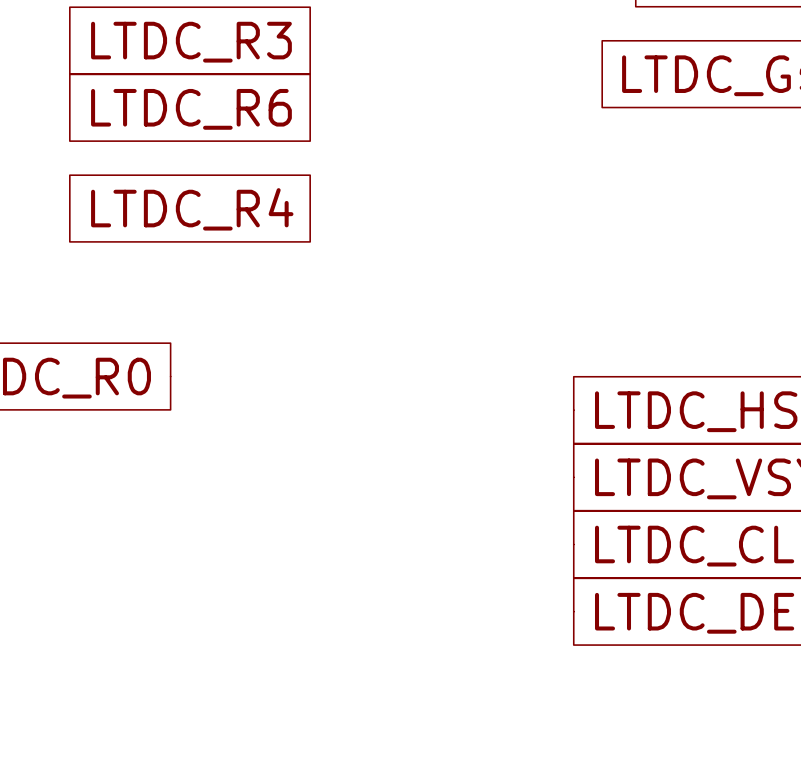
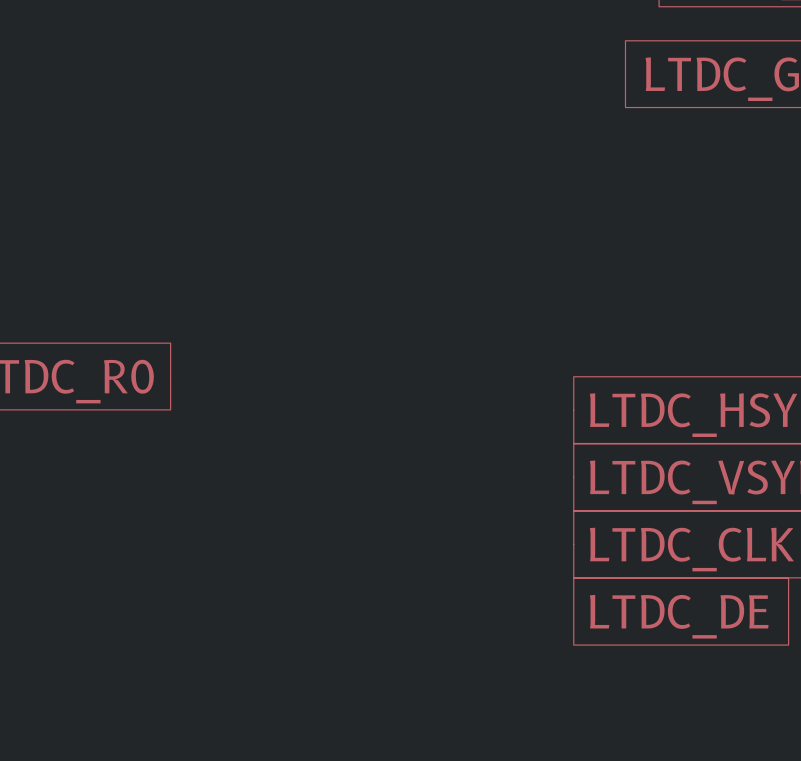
global label: LTDC_R3 (191, 42) -> none
global label: LTDC_R6 (191, 109) -> none
global label: LTDC_R4 (192, 209) -> none

